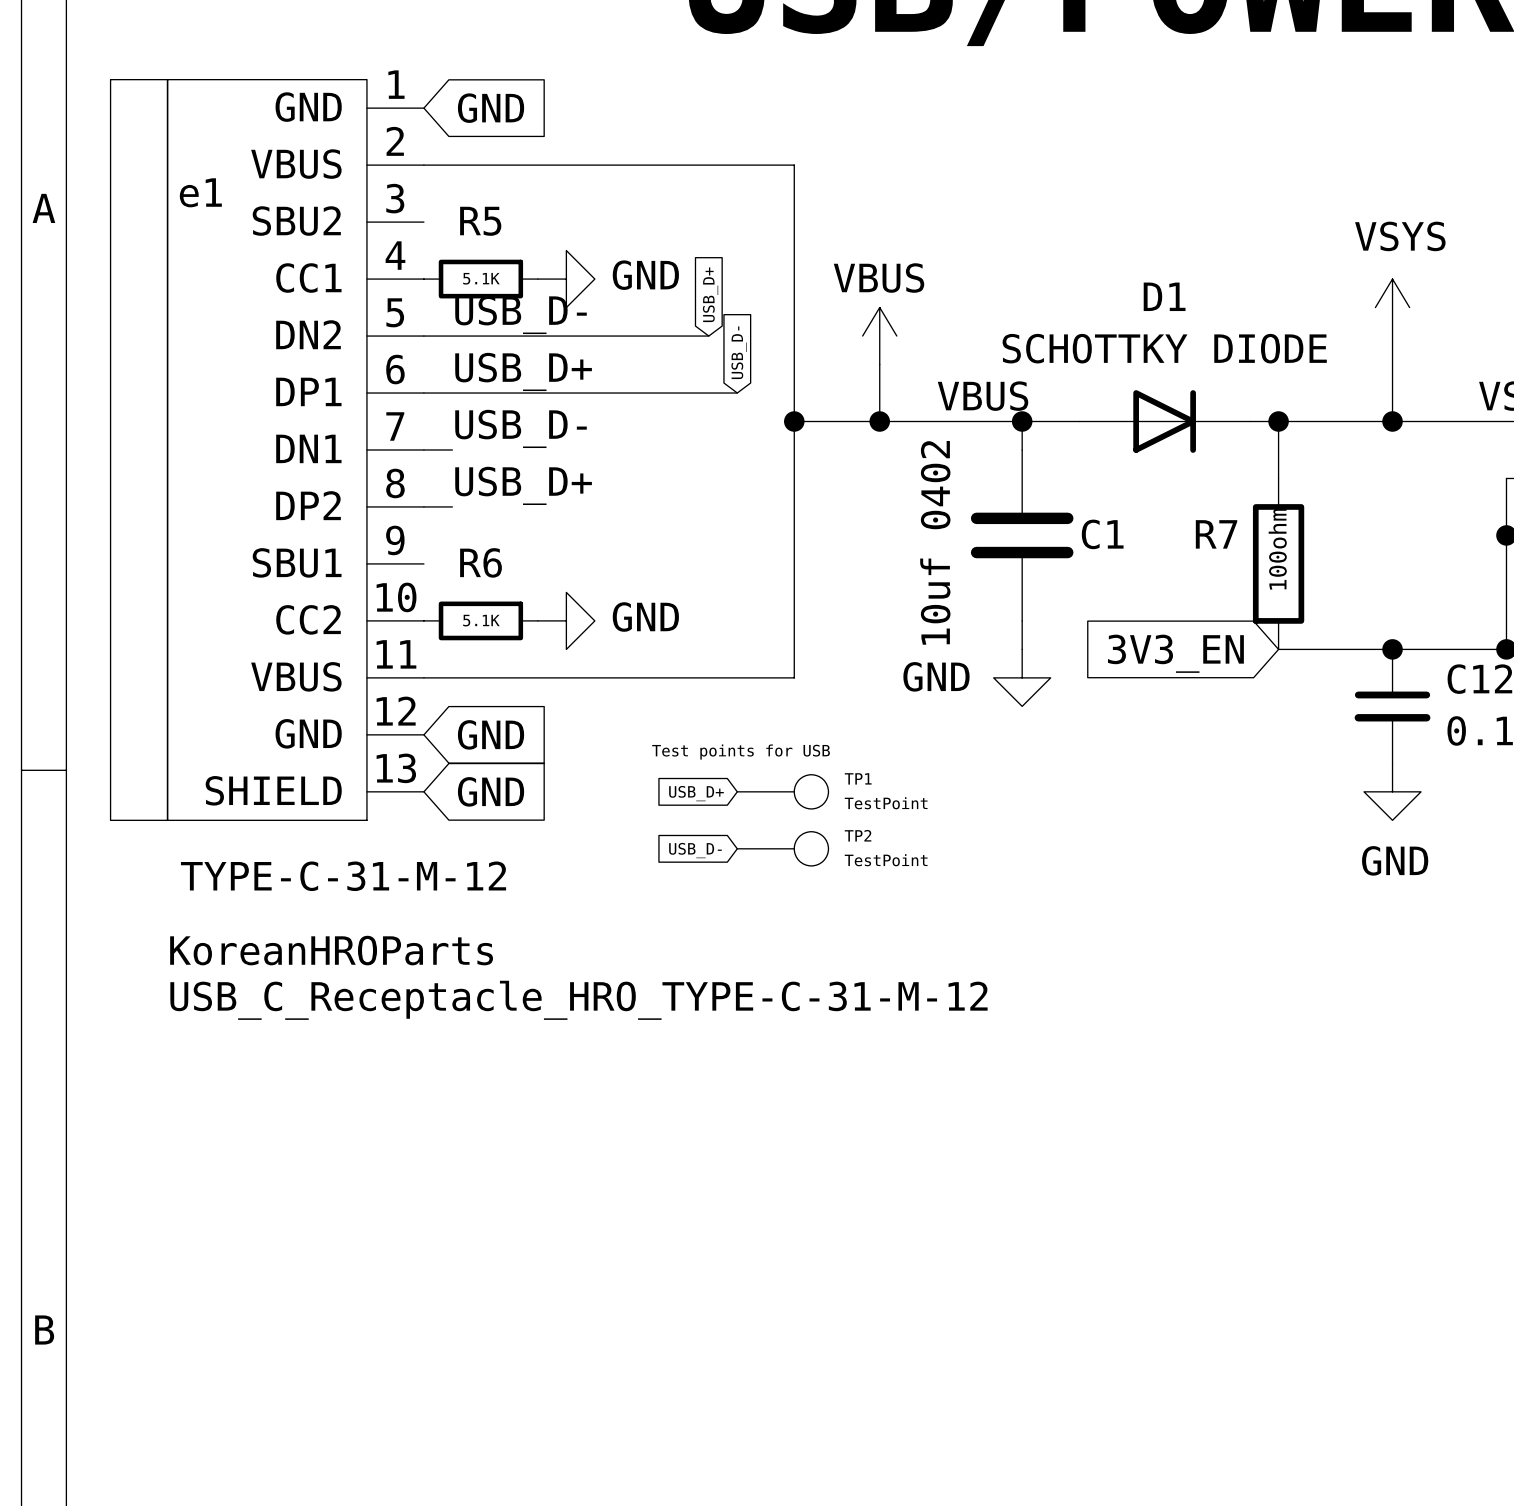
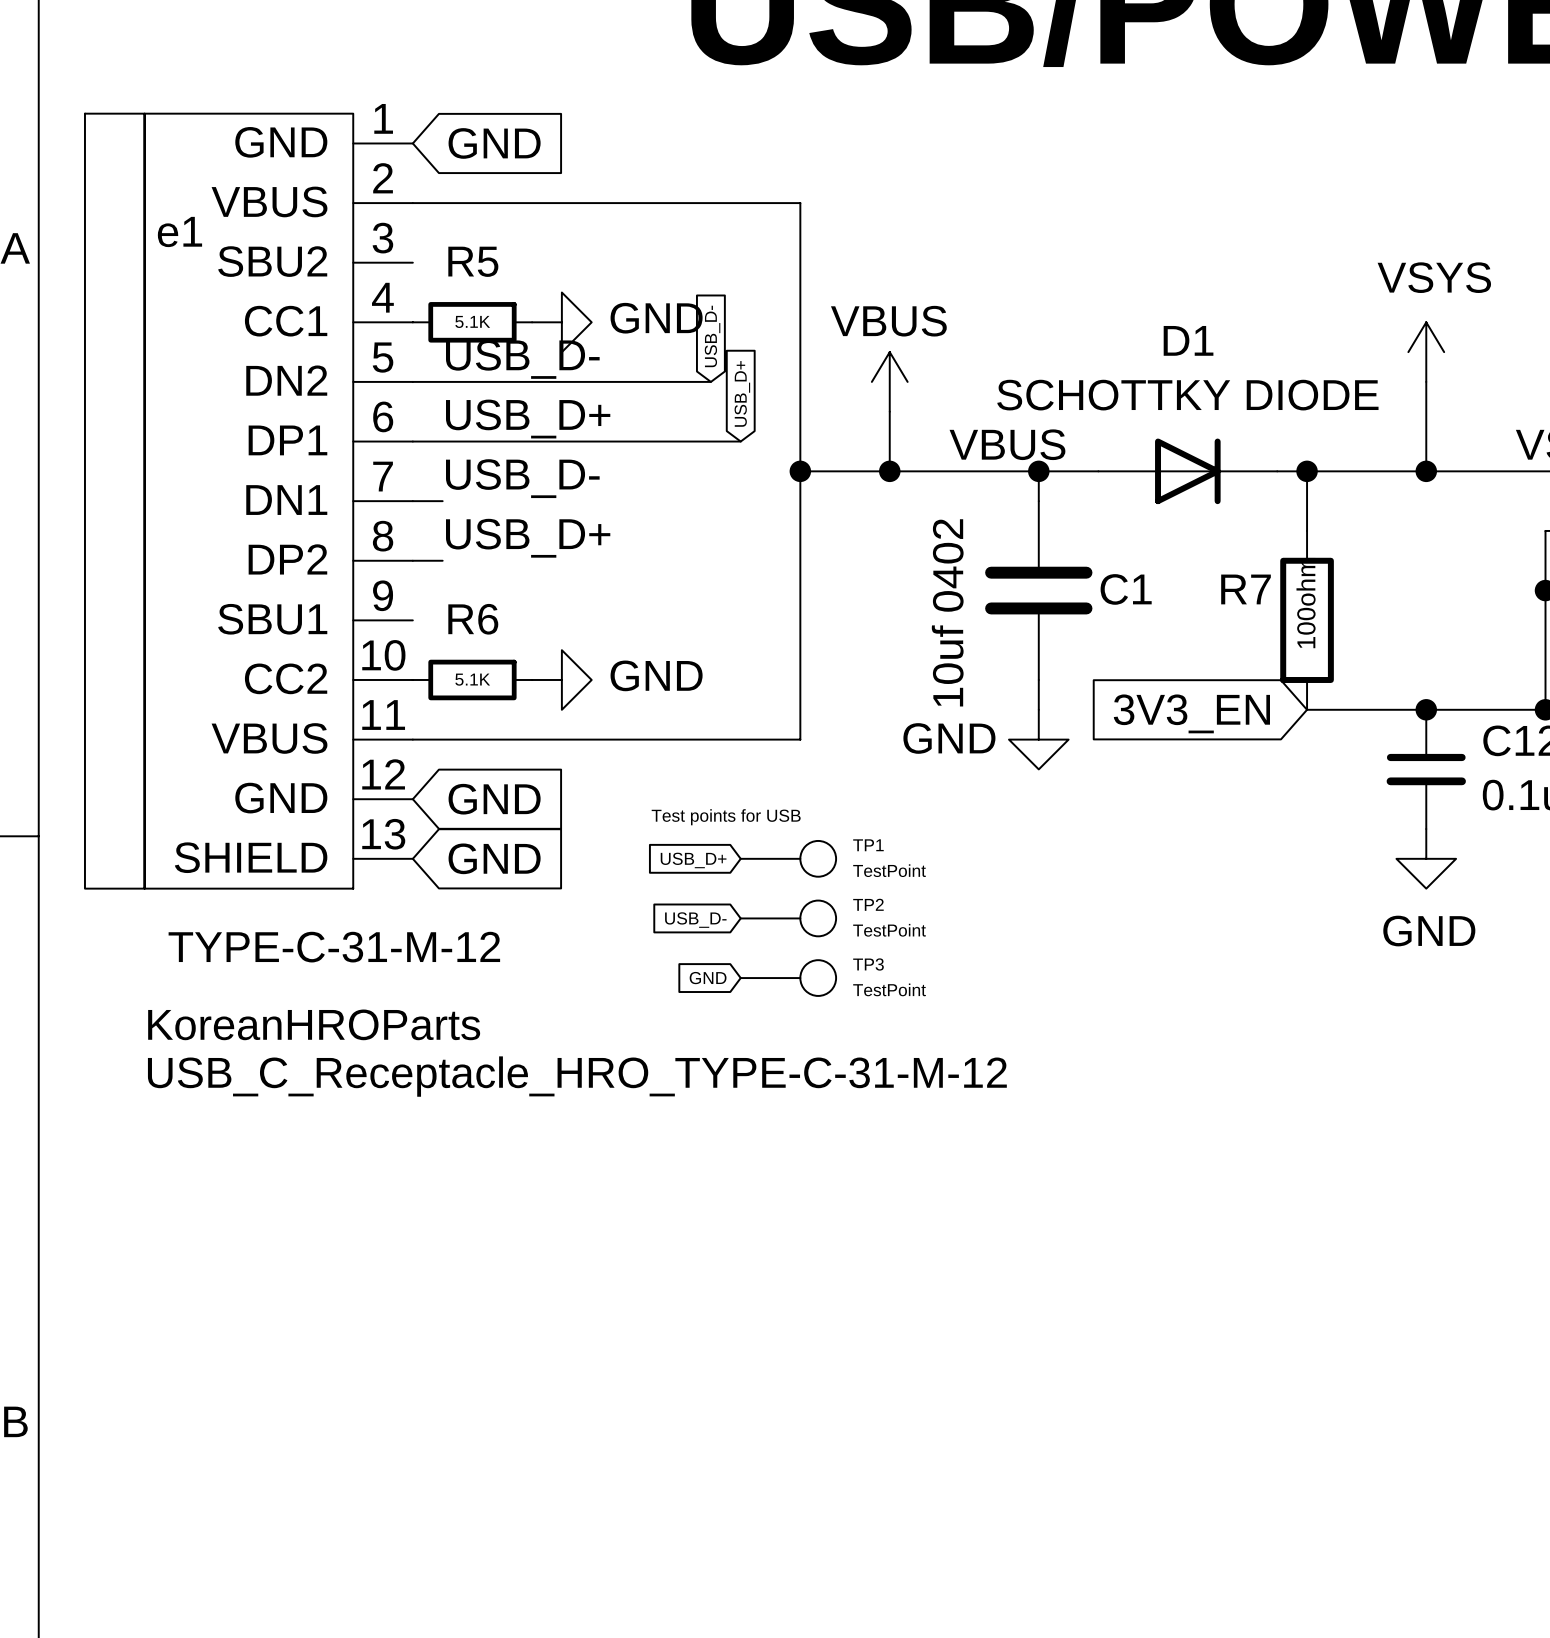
global label: USB_D+ (710, 294) -> USB_D- (712, 336)
global label: USB_D- (739, 352) -> USB_D+ (742, 393)
global label: none -> GND (708, 978)
TP3: none -> TestPoint (788, 978)

